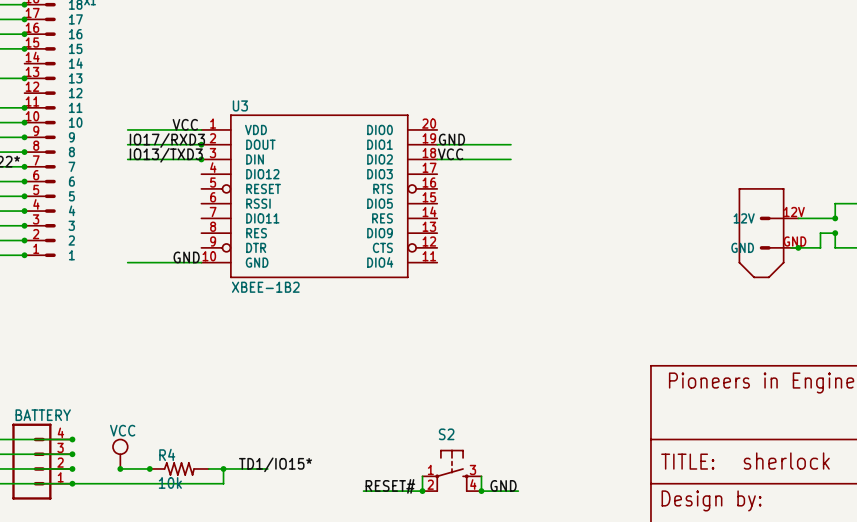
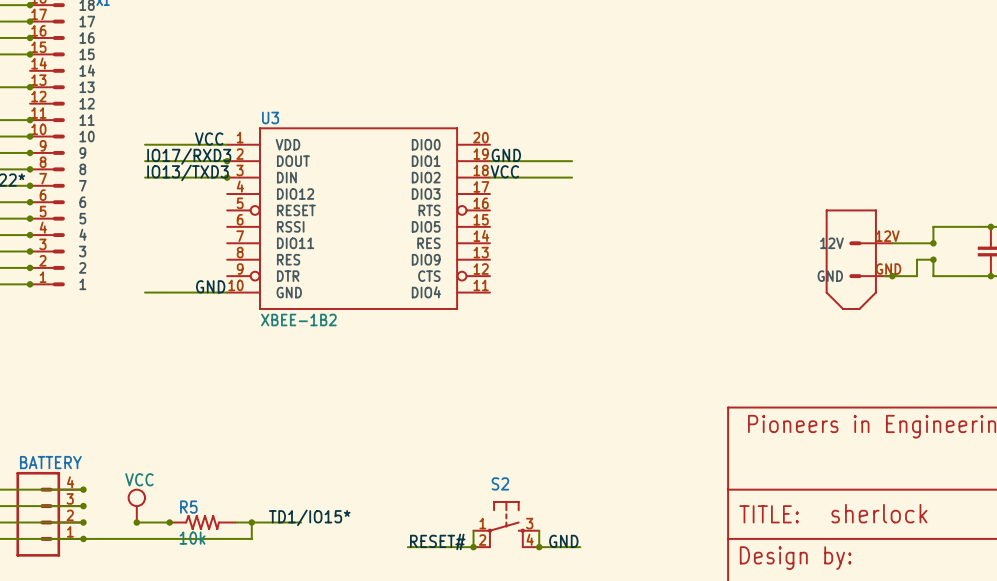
R4 name: R4 (167, 454) -> R5 (188, 507)

